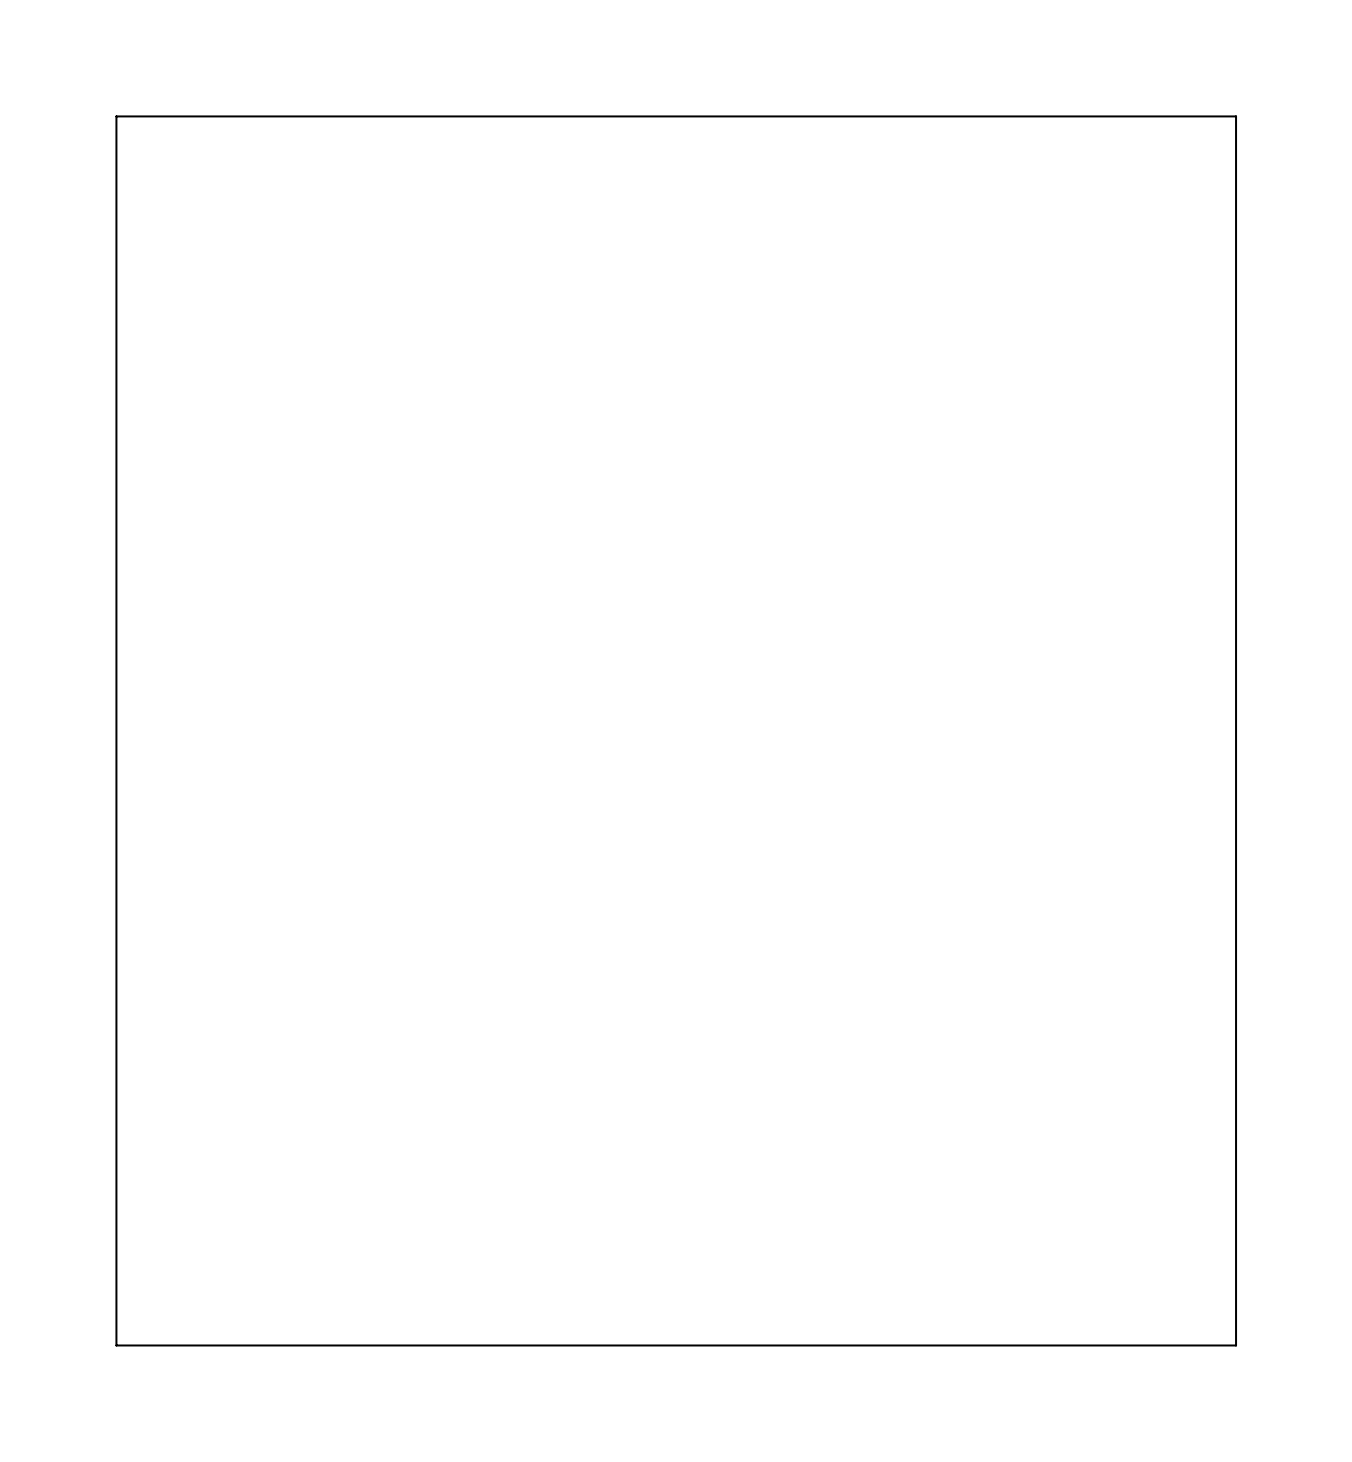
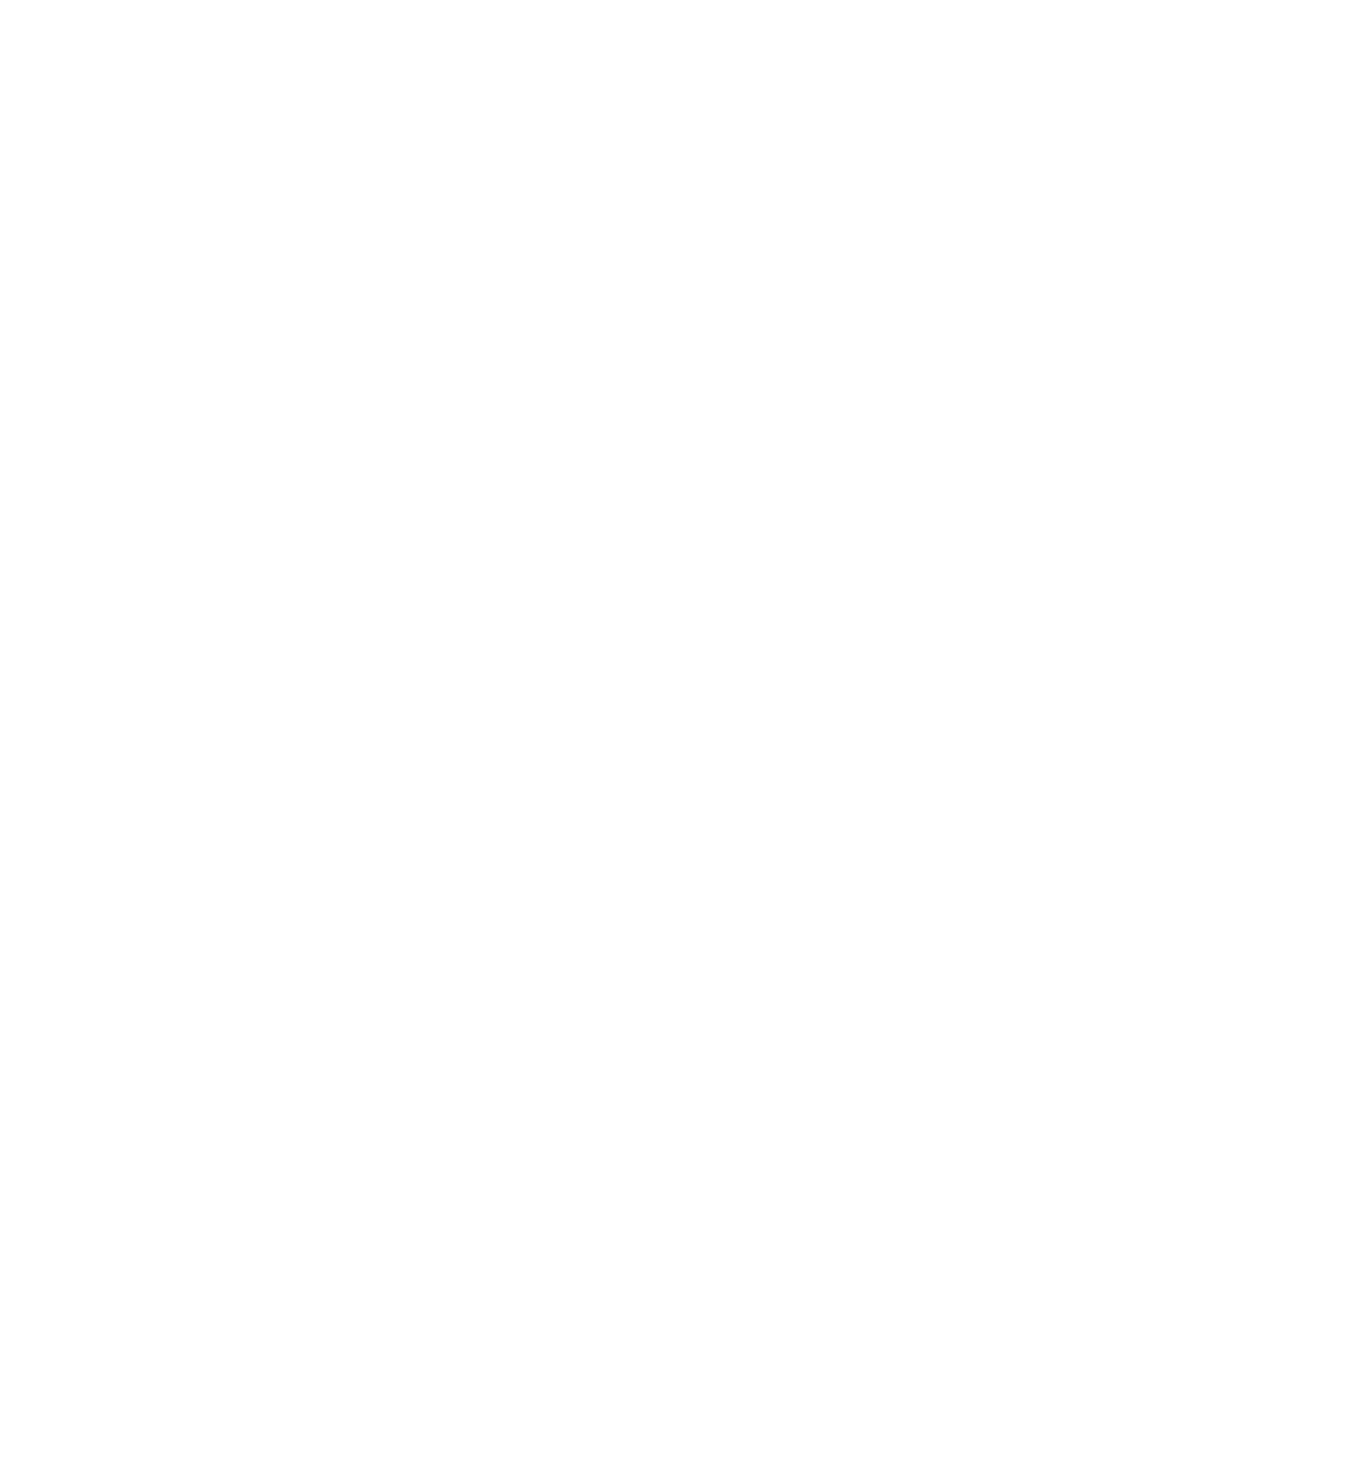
board edge: (1236, 116) (116, 116) (116, 1345) (1236, 1345) (1236, 116) -> none

